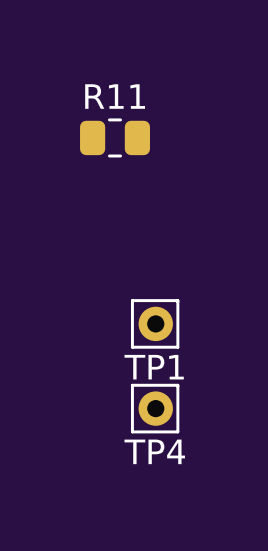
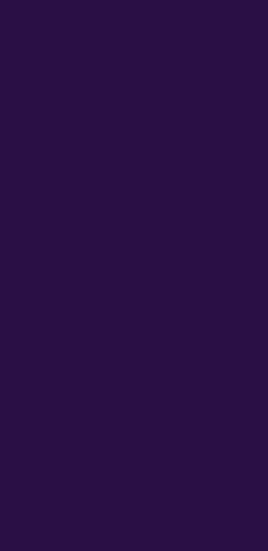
R11: (115, 137) -> none
TP1: (155, 323) -> none
TP4: (155, 408) -> none

